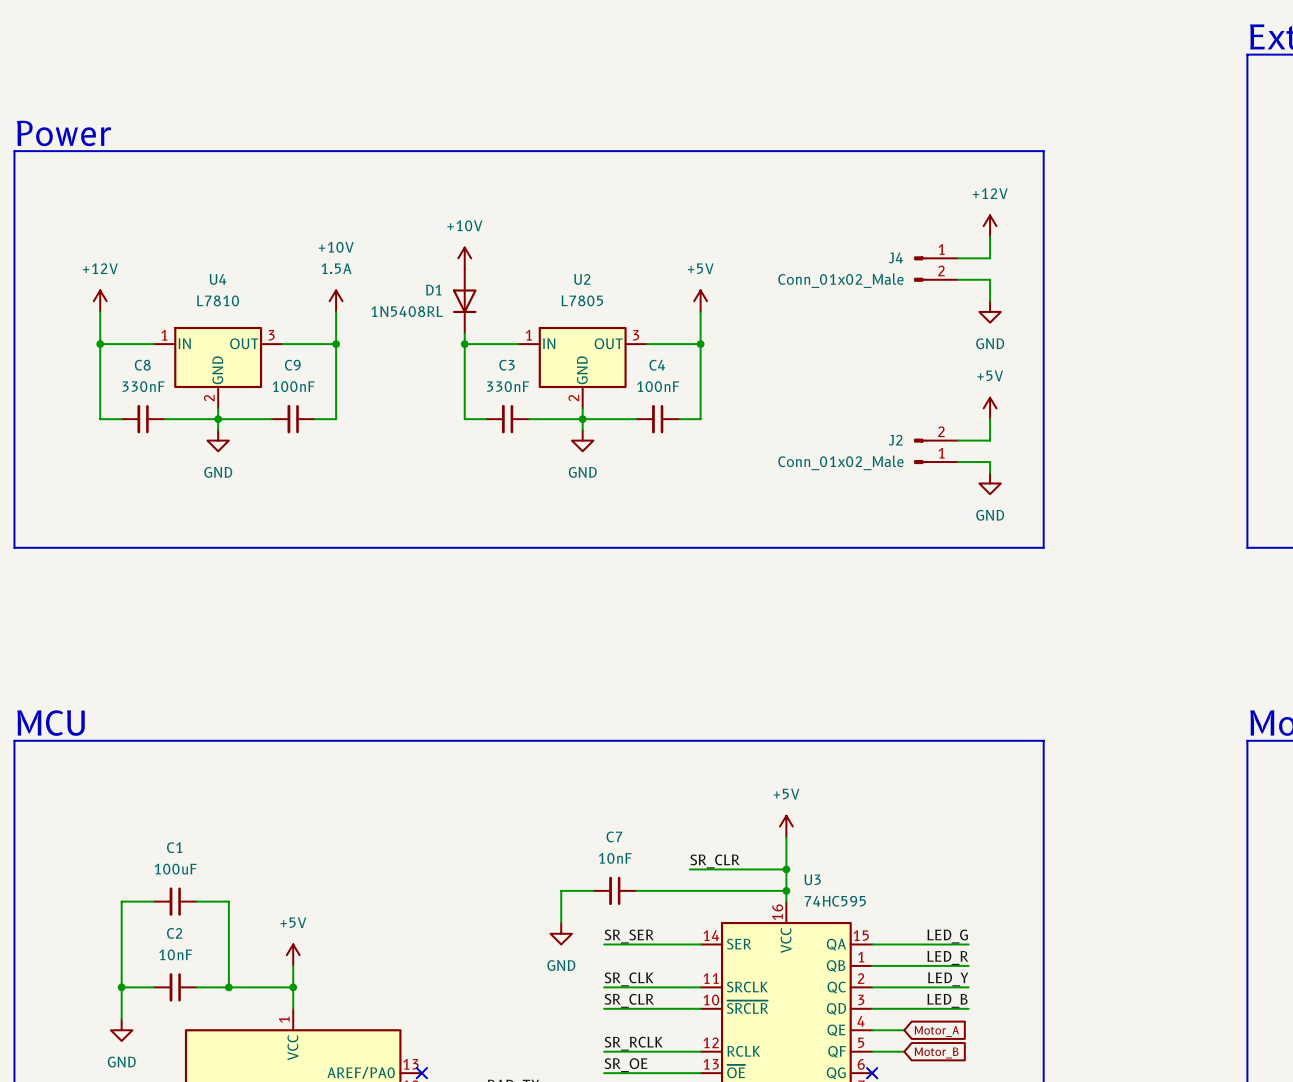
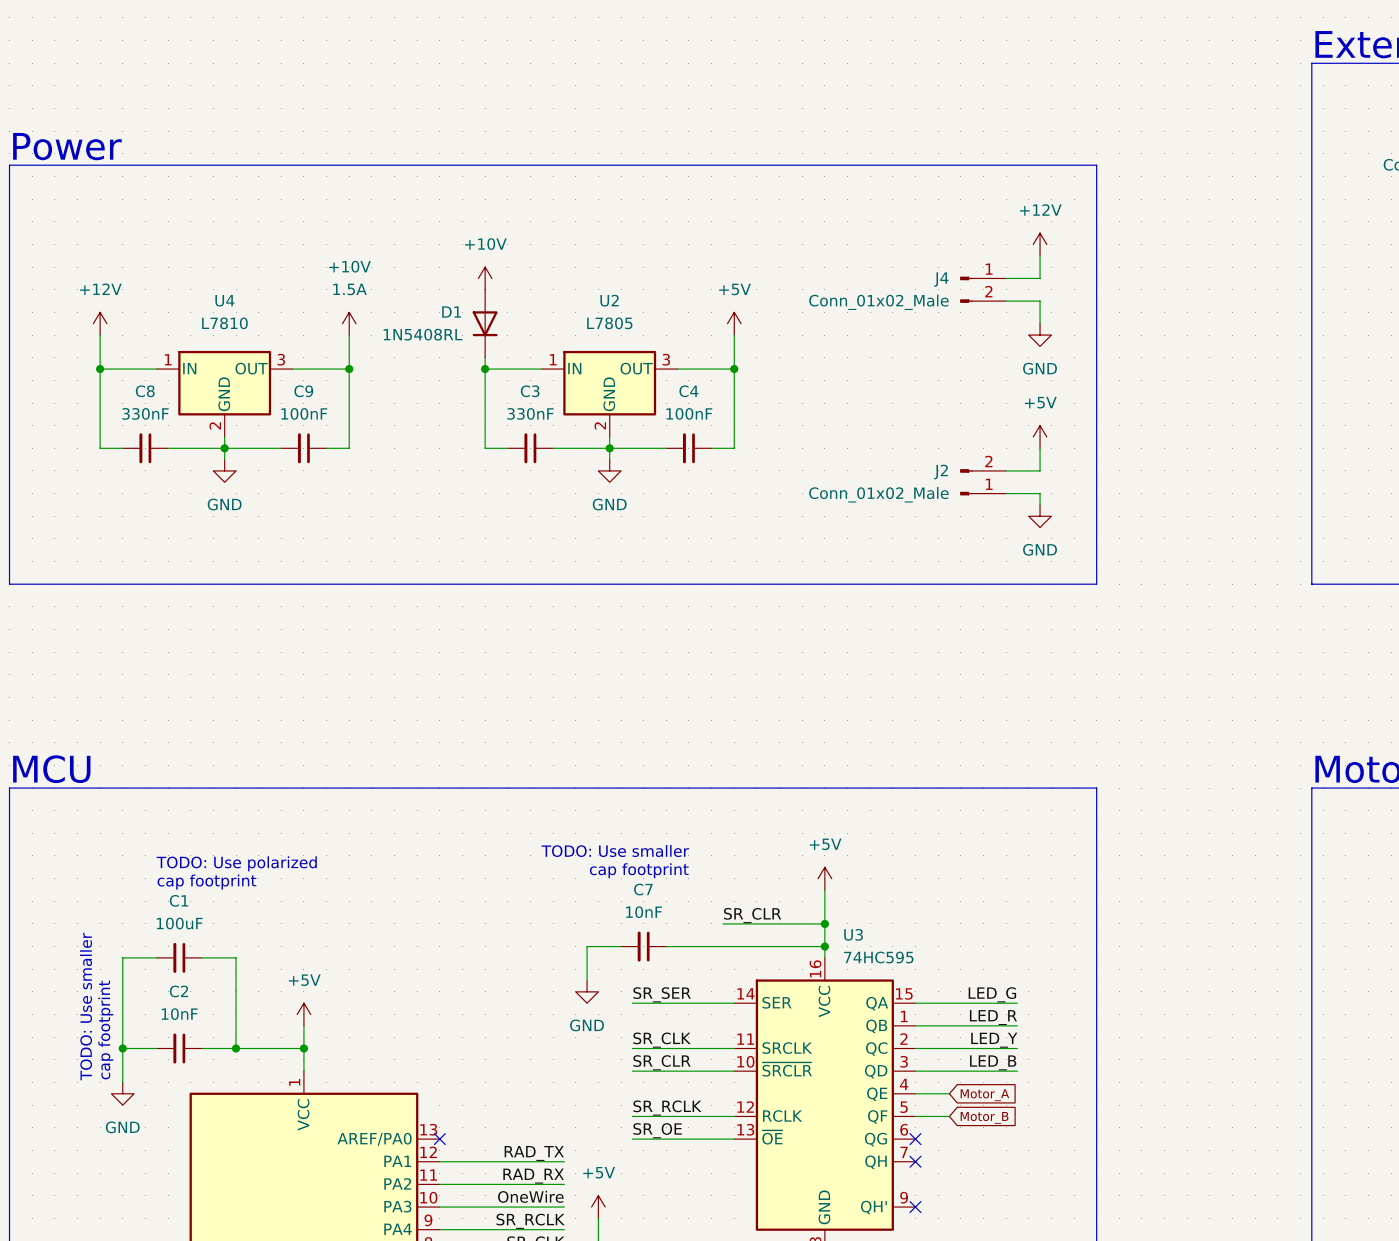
text: none -> TODO: Use smaller (615, 851)
text: none -> TODO: Use polarized (236, 863)
text: none -> cap footprint (639, 870)
text: none -> cap footprint (206, 882)
text: none -> TODO: Use smaller (86, 1006)
text: none -> cap footprint (105, 1030)

